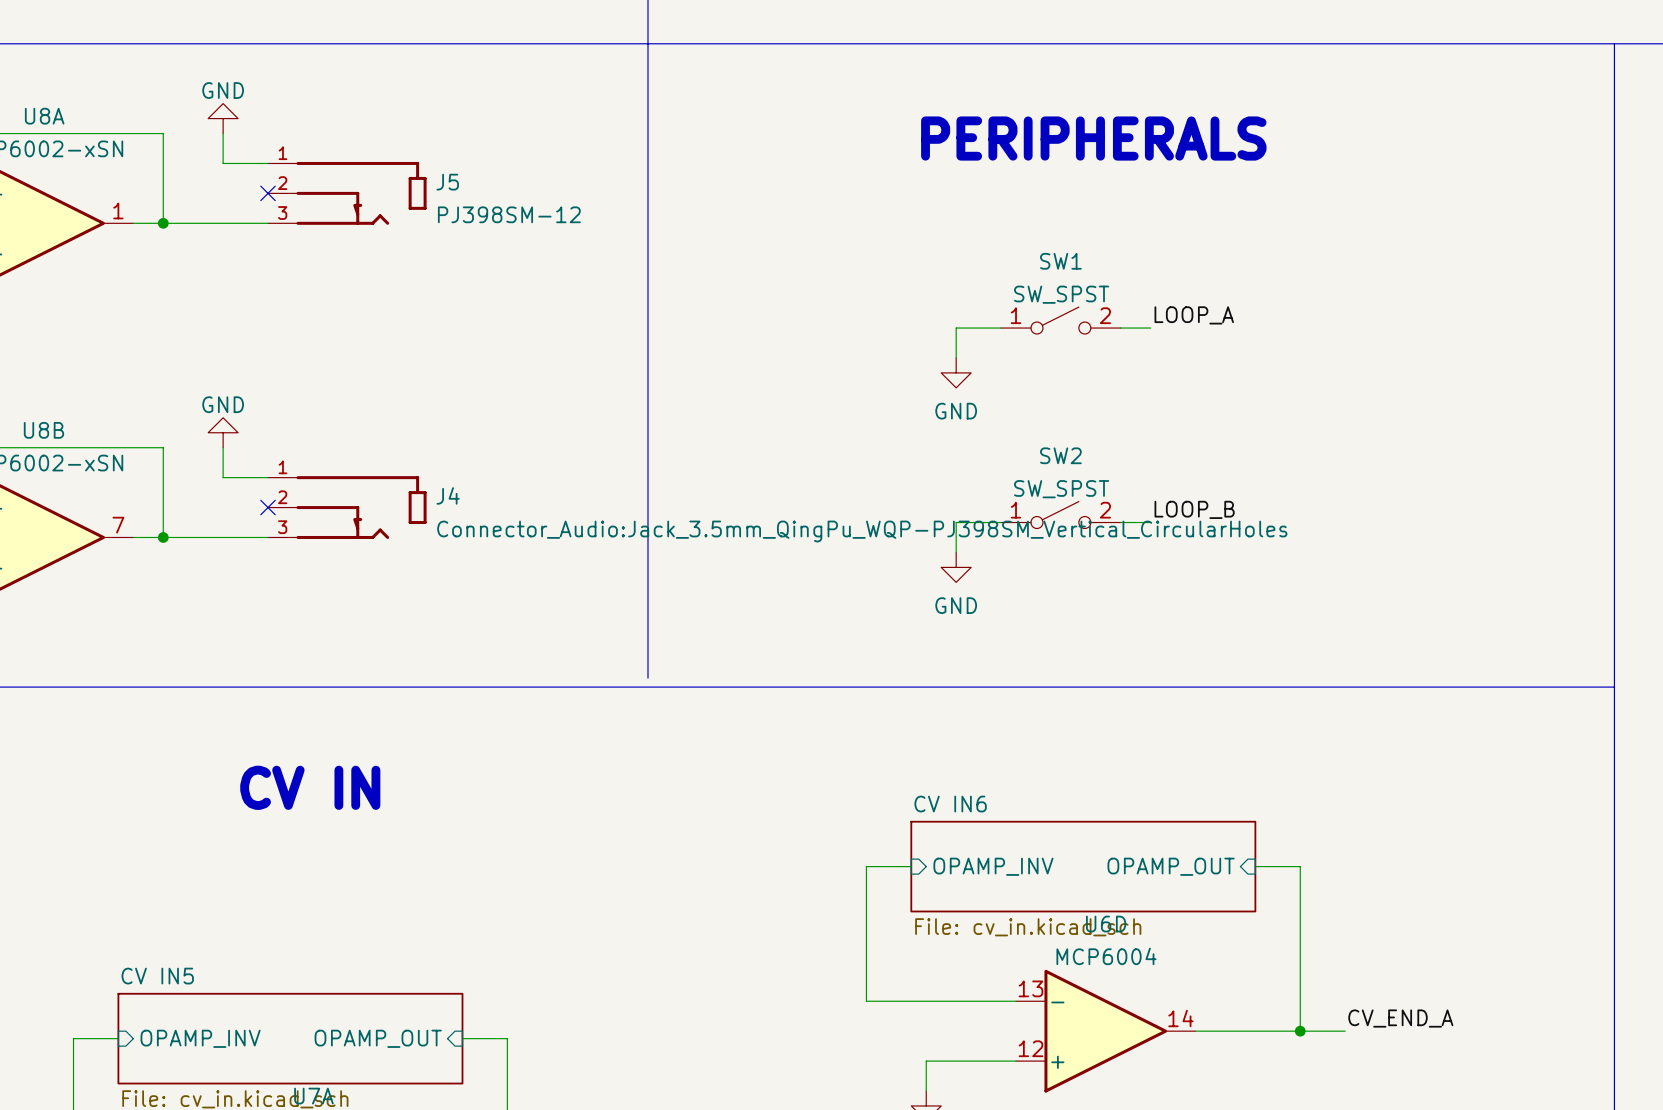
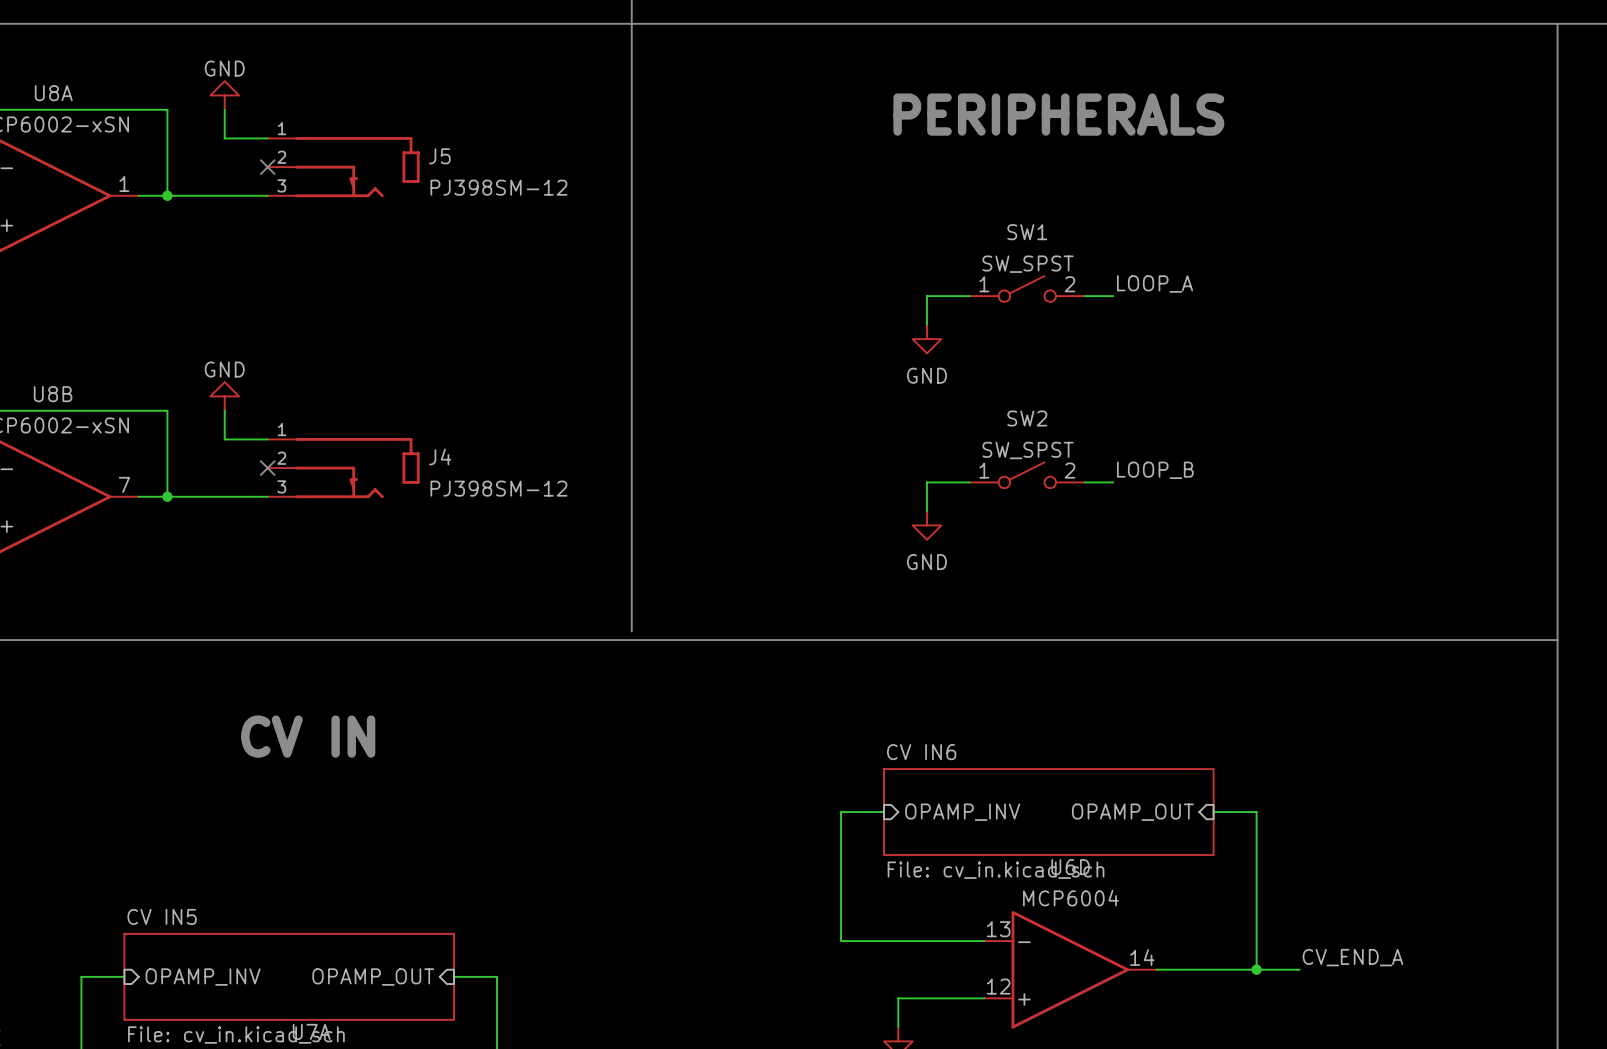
J4 value: Connector_Audio:Jack_3.5mm_QingPu_WQP-PJ398SM_Vertical_CircularHoles (862, 531) -> PJ398SM-12 (498, 488)

